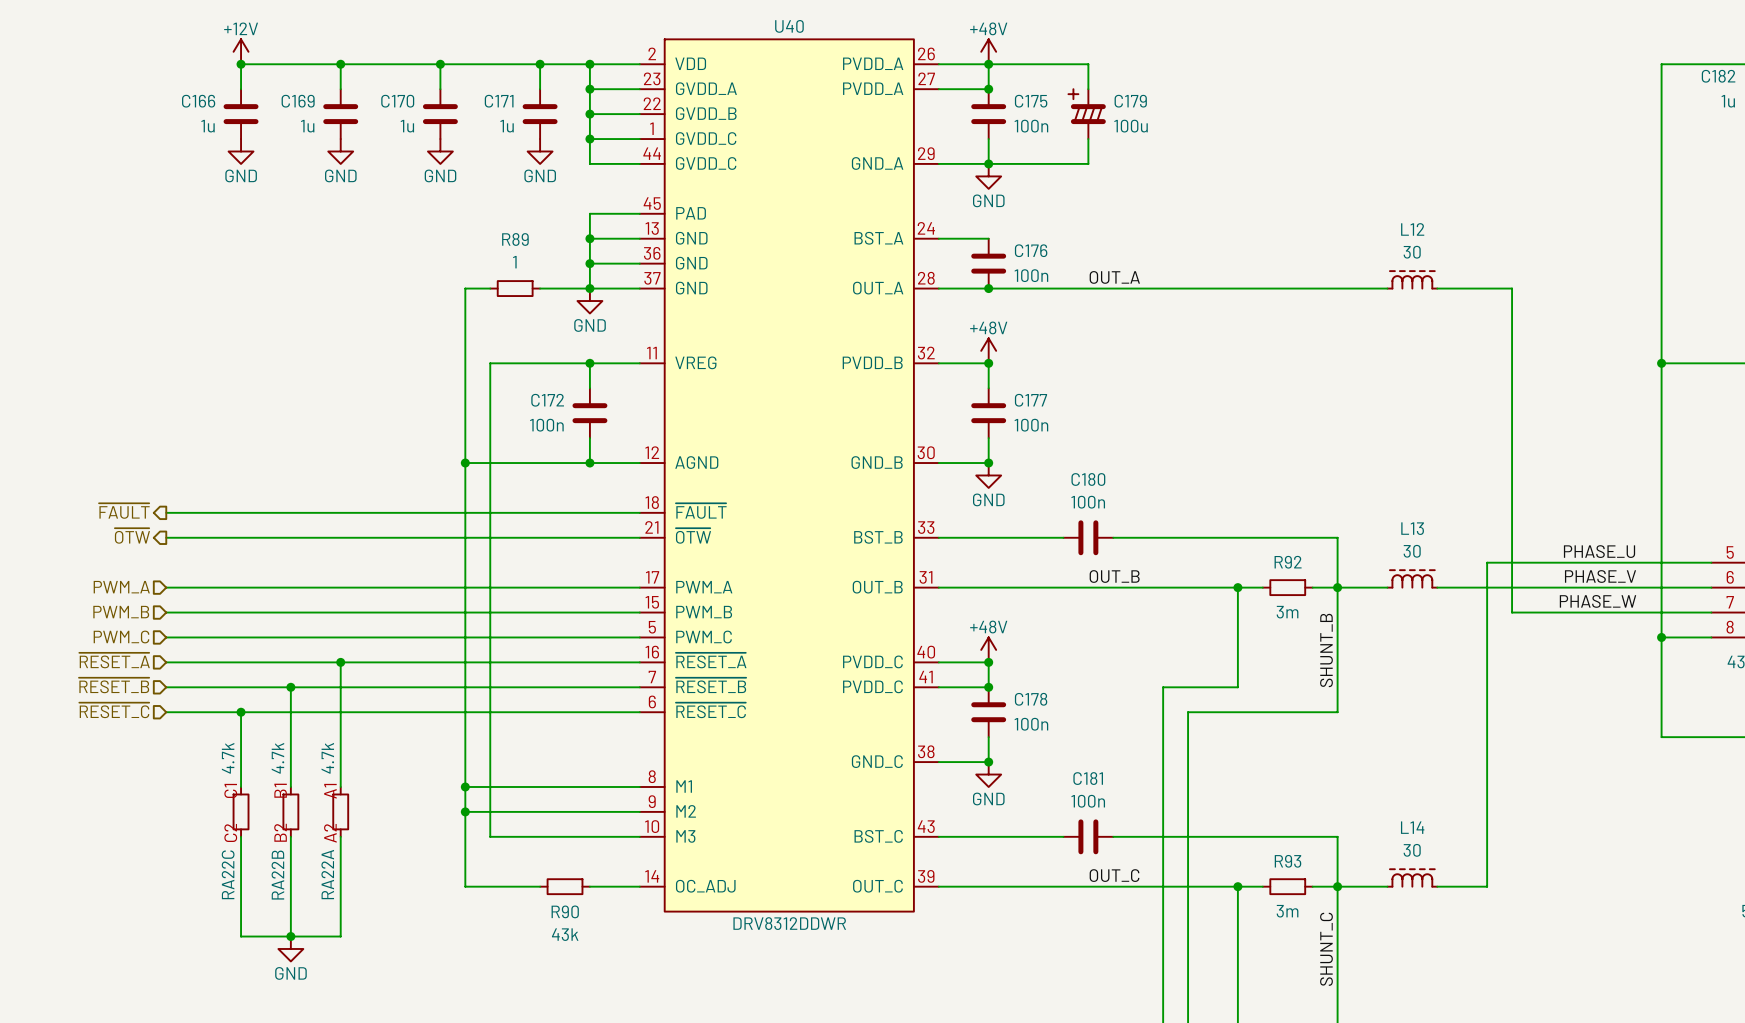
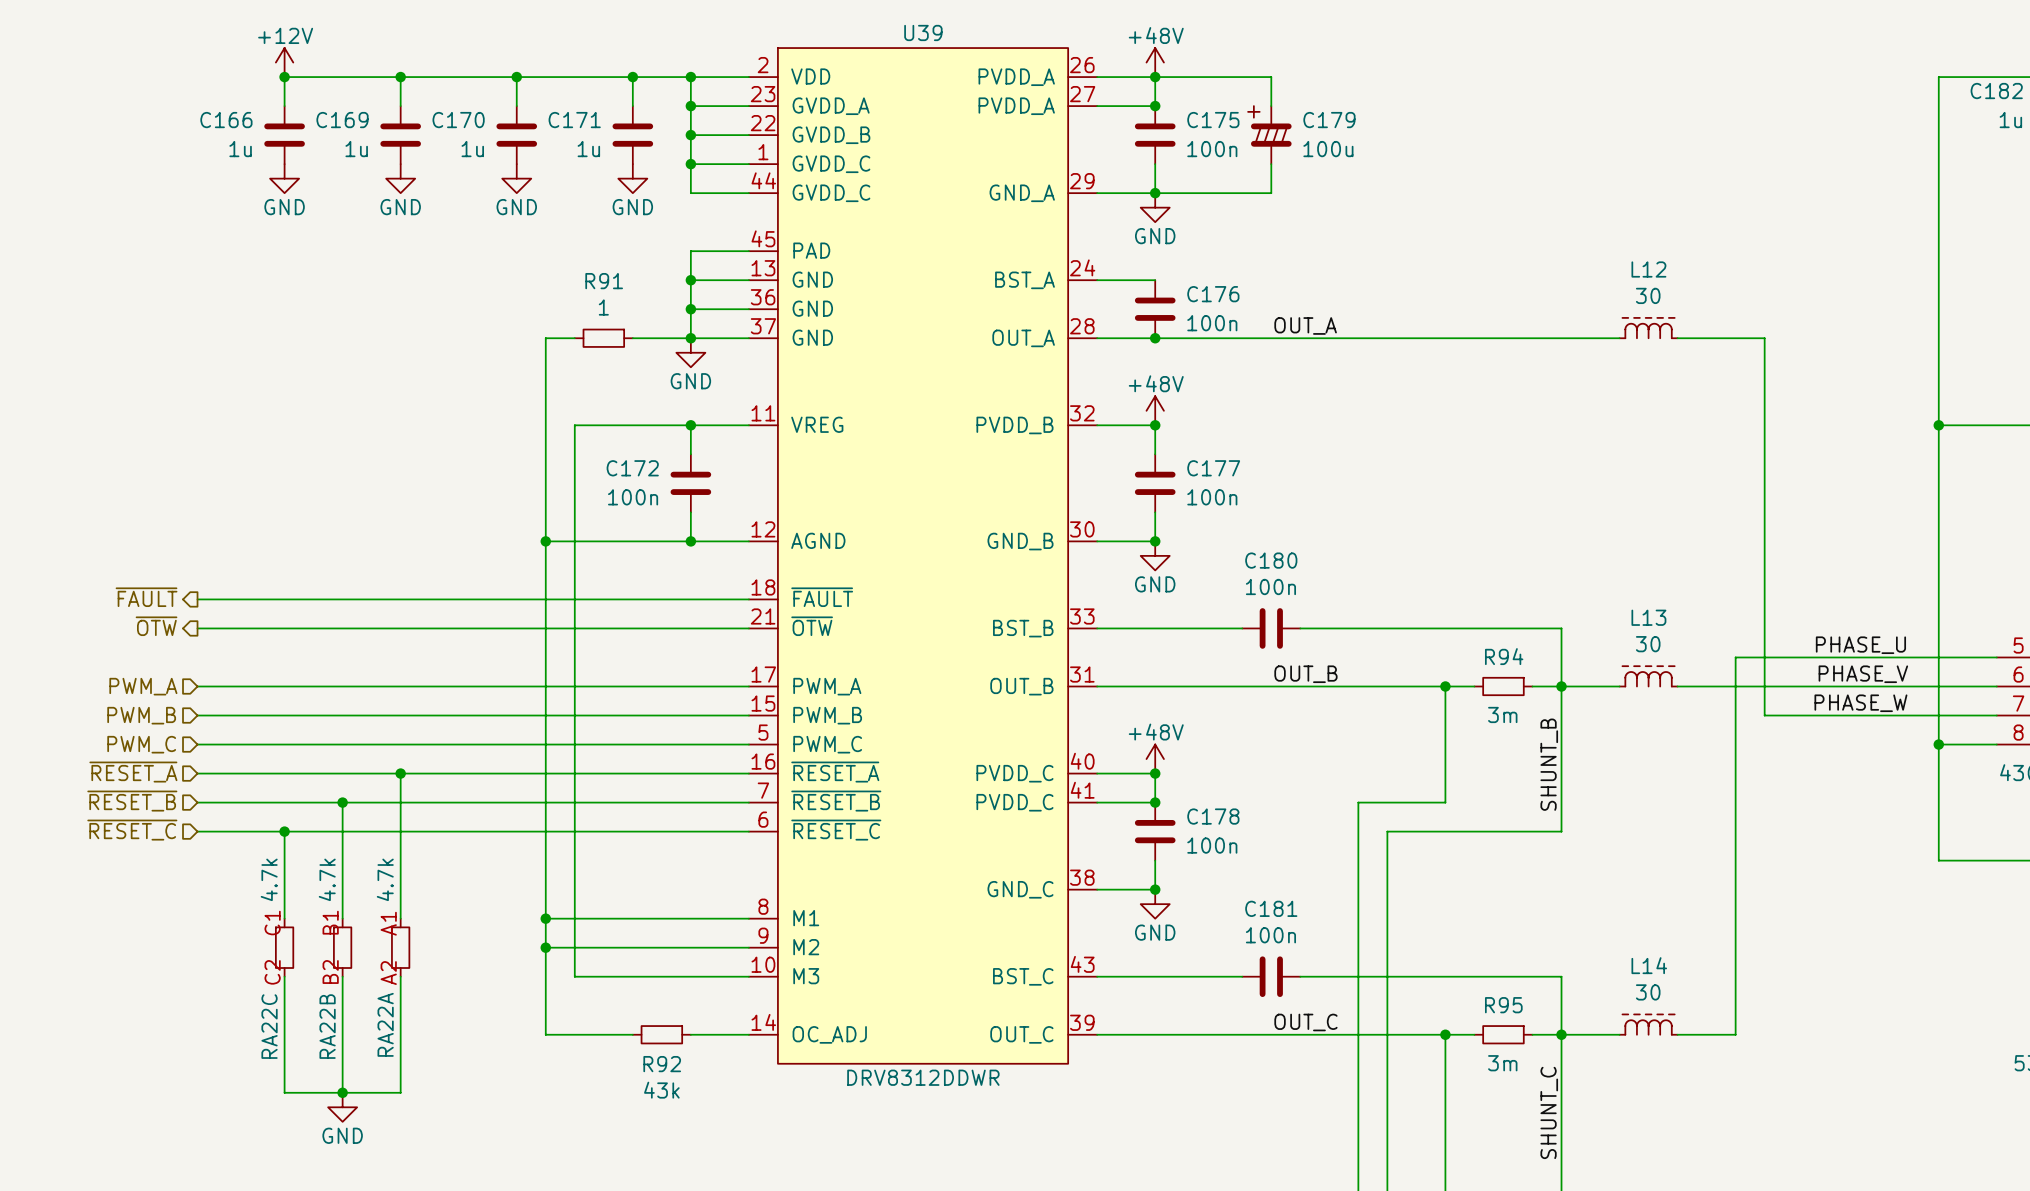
U40 name: U40 (789, 26) -> U39 (923, 32)
R89 name: R89 (515, 239) -> R91 (604, 281)
R92 name: R92 (1288, 562) -> R94 (1504, 656)
R93 name: R93 (1288, 861) -> R95 (1503, 1005)
R90 name: R90 (565, 911) -> R92 (662, 1064)

